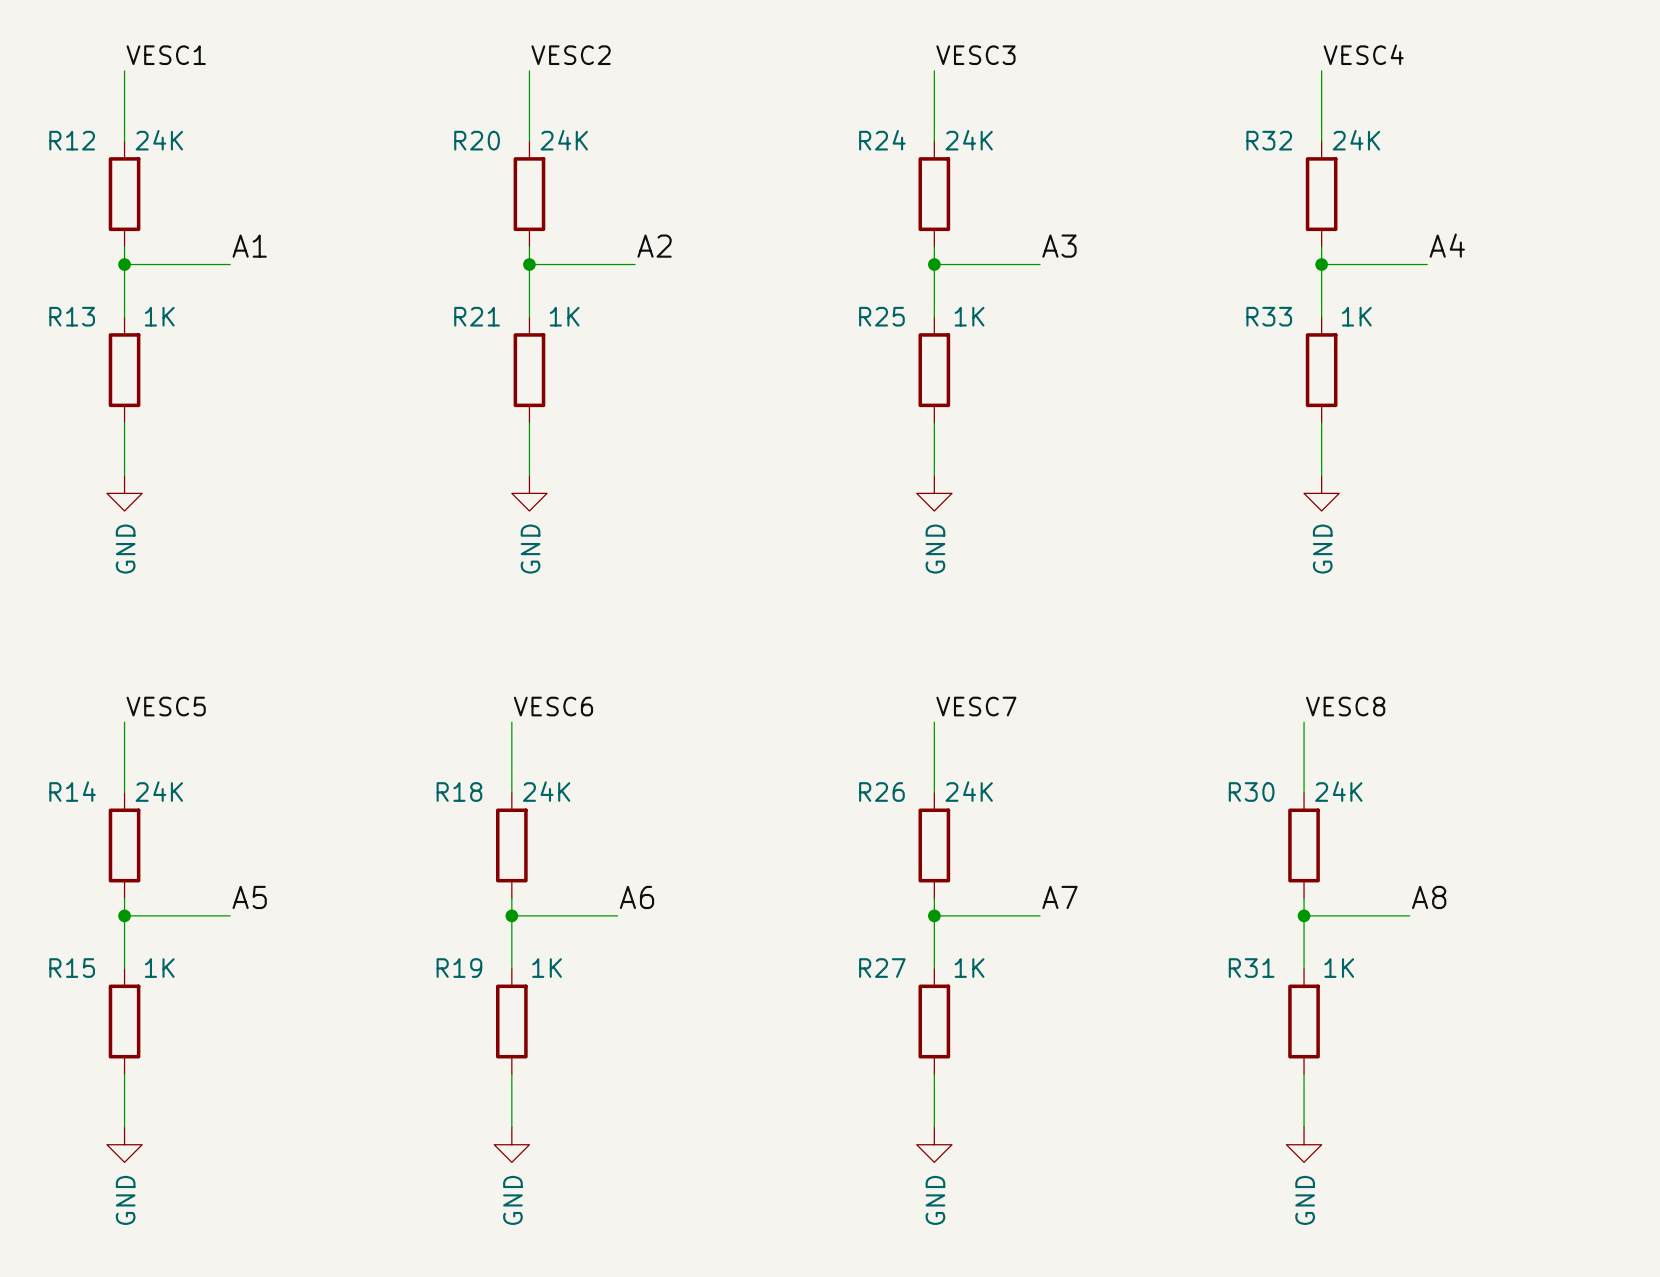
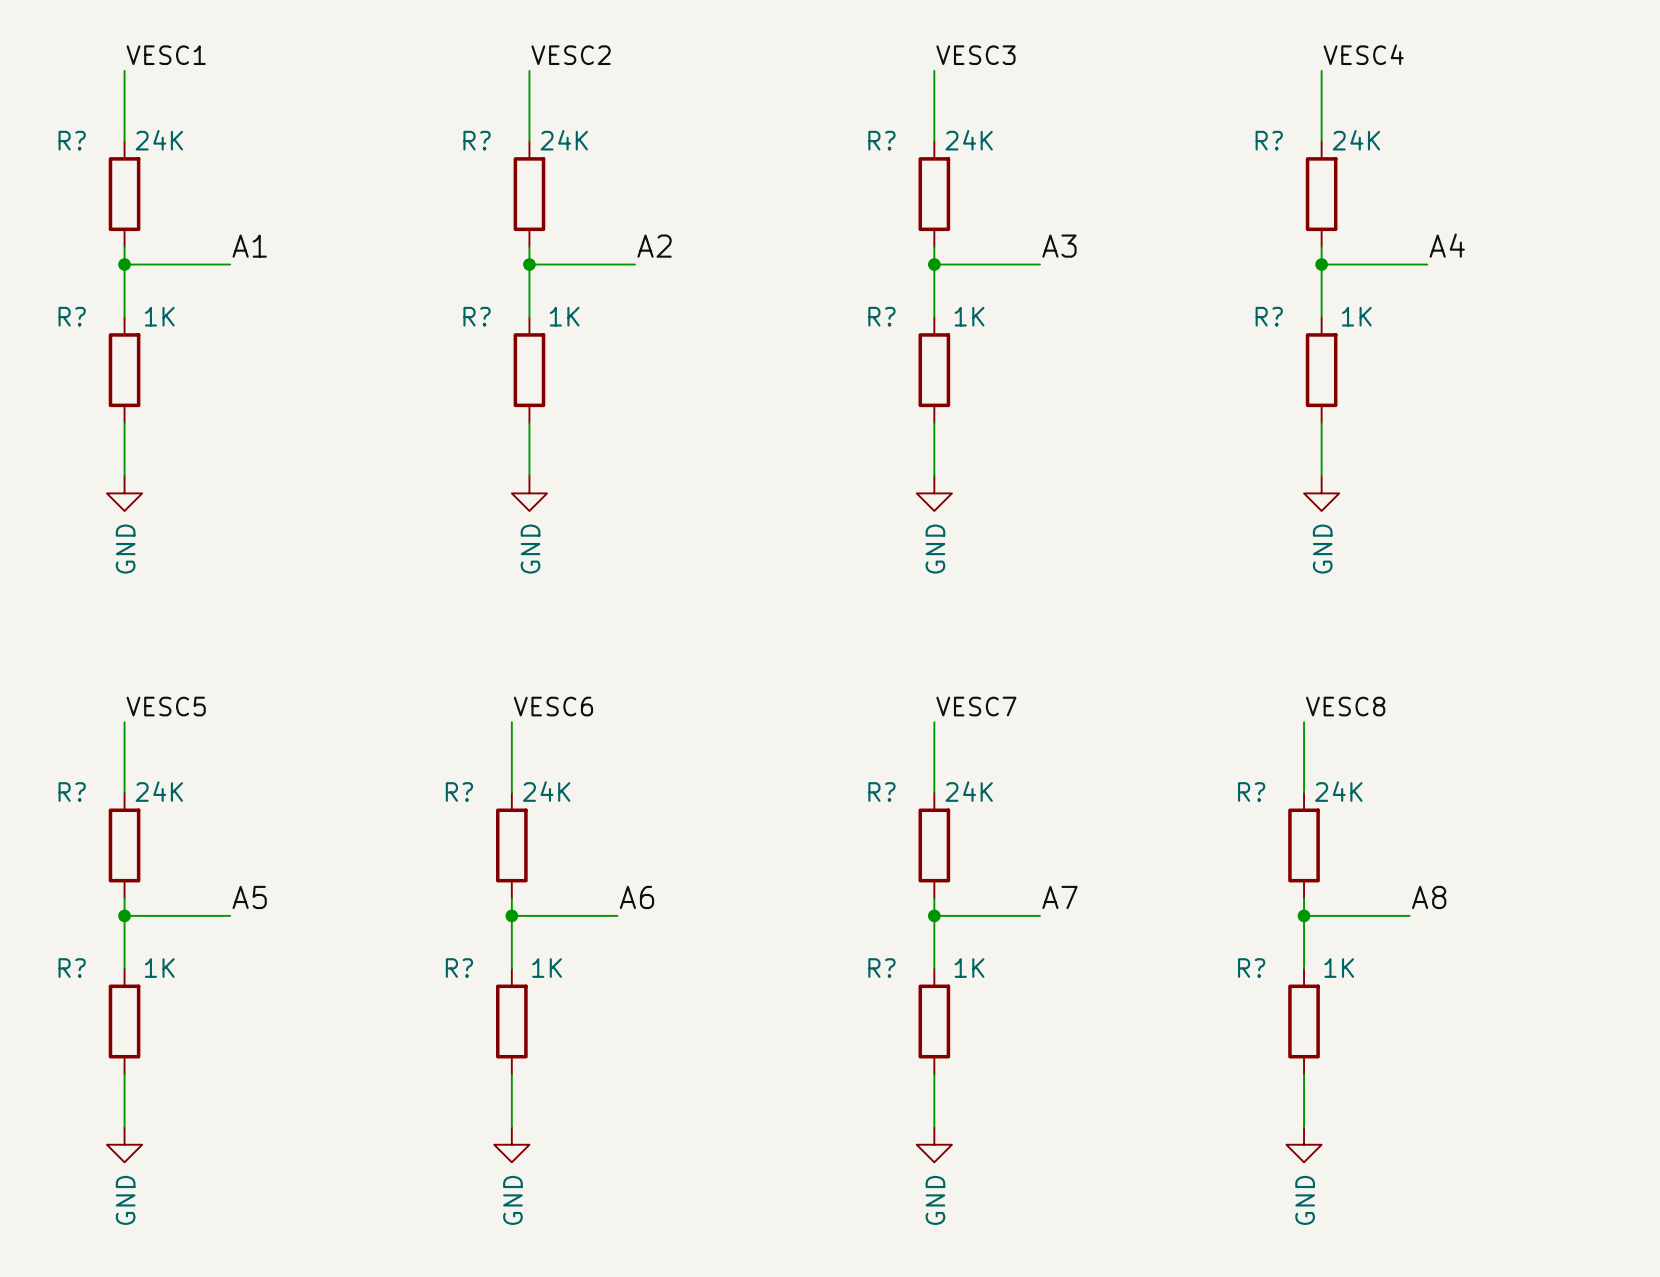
R12 name: R12 (72, 140) -> R? (72, 140)
R20 name: R20 (477, 140) -> R? (477, 140)
R24 name: R24 (882, 140) -> R? (881, 140)
R32 name: R32 (1269, 140) -> R? (1269, 140)
R13 name: R13 (72, 316) -> R? (72, 316)
R21 name: R21 (477, 316) -> R? (477, 316)
R25 name: R25 (881, 316) -> R? (881, 316)
R33 name: R33 (1269, 316) -> R? (1269, 316)
R14 name: R14 (72, 791) -> R? (72, 792)
R18 name: R18 (459, 792) -> R? (459, 792)
R26 name: R26 (881, 792) -> R? (881, 792)
R30 name: R30 (1251, 792) -> R? (1251, 792)
R15 name: R15 (72, 968) -> R? (72, 968)
R19 name: R19 (459, 968) -> R? (459, 968)
R27 name: R27 (882, 968) -> R? (881, 968)
R31 name: R31 (1251, 968) -> R? (1251, 968)

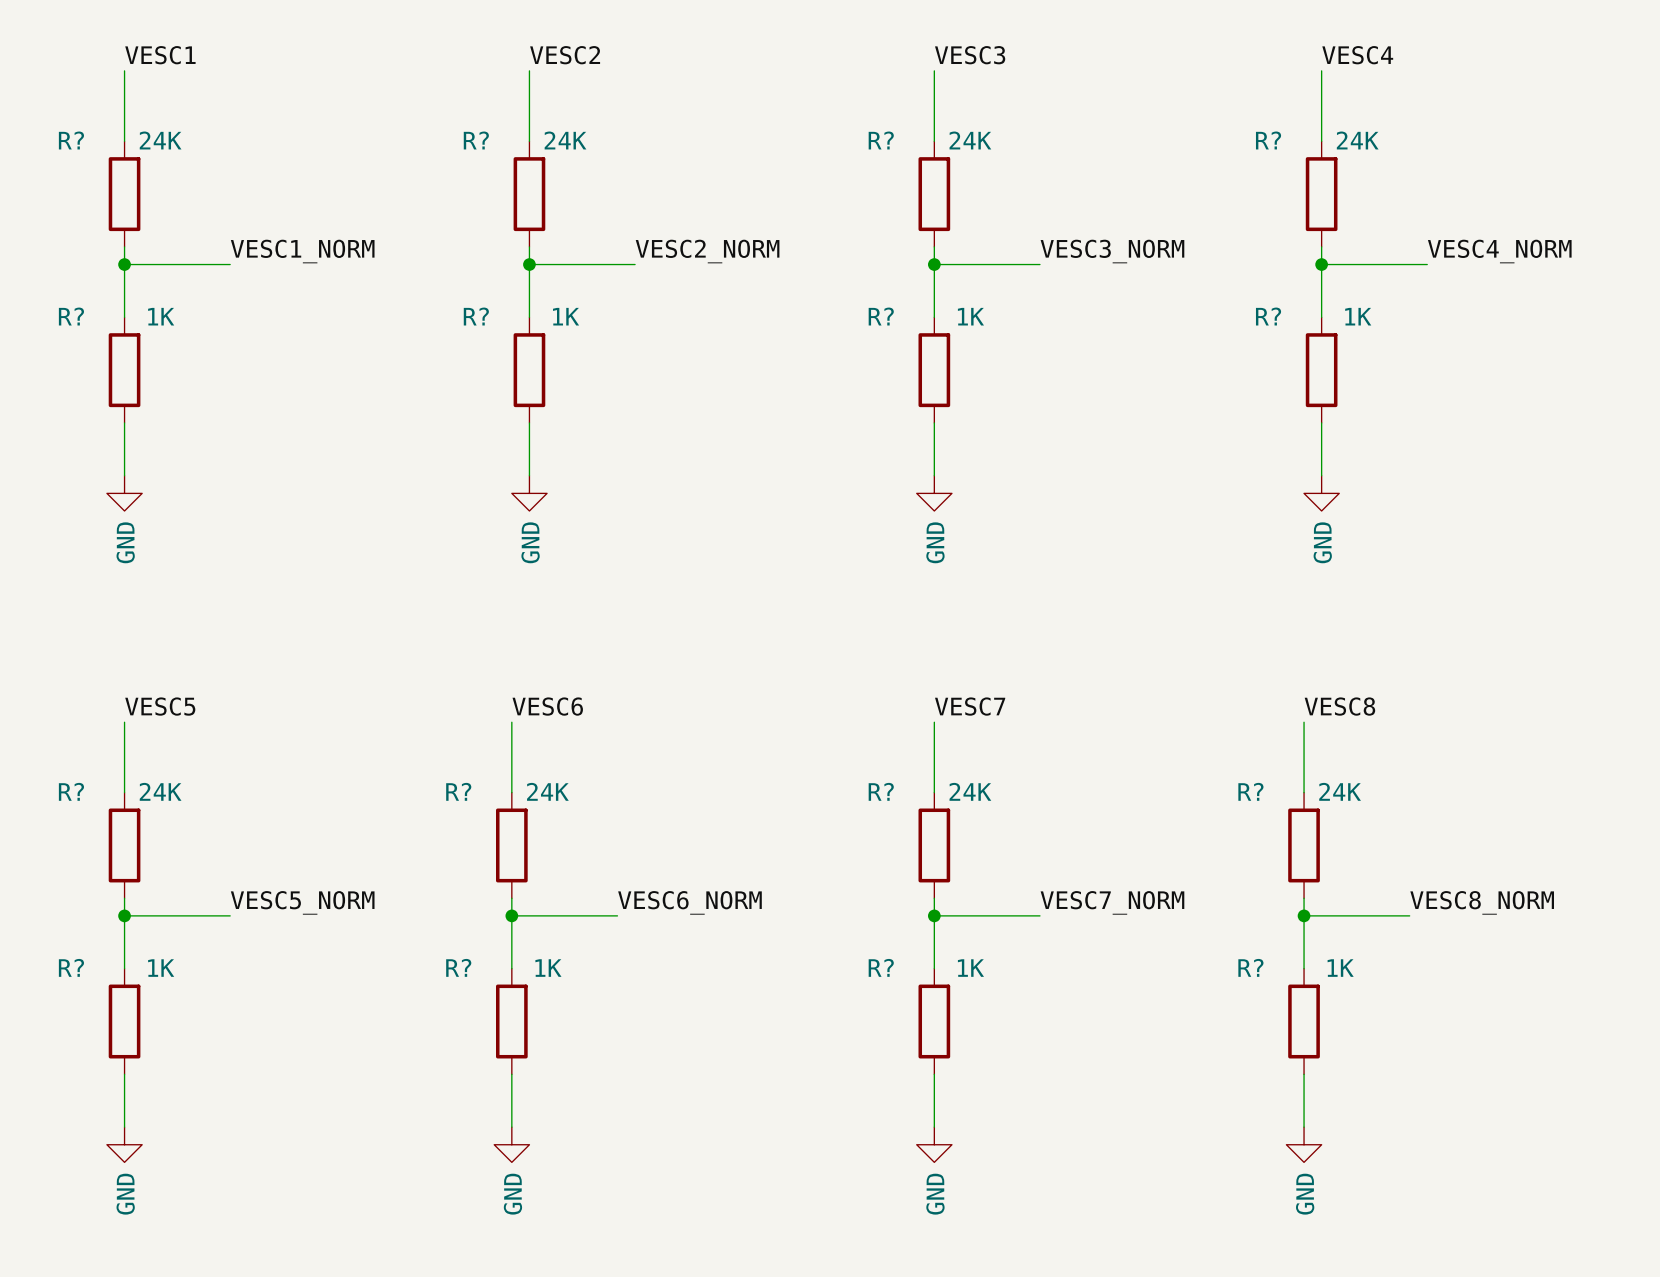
label: A4 (1447, 245) -> VESC4_NORM (1499, 251)
label: A1 (249, 246) -> VESC1_NORM (302, 251)
label: A2 (654, 246) -> VESC2_NORM (707, 251)
label: A3 (1059, 246) -> VESC3_NORM (1112, 251)
label: A5 (249, 897) -> VESC5_NORM (302, 902)
label: A6 (636, 897) -> VESC6_NORM (689, 902)
label: A7 (1059, 897) -> VESC7_NORM (1112, 902)
label: A8 (1429, 897) -> VESC8_NORM (1482, 902)

